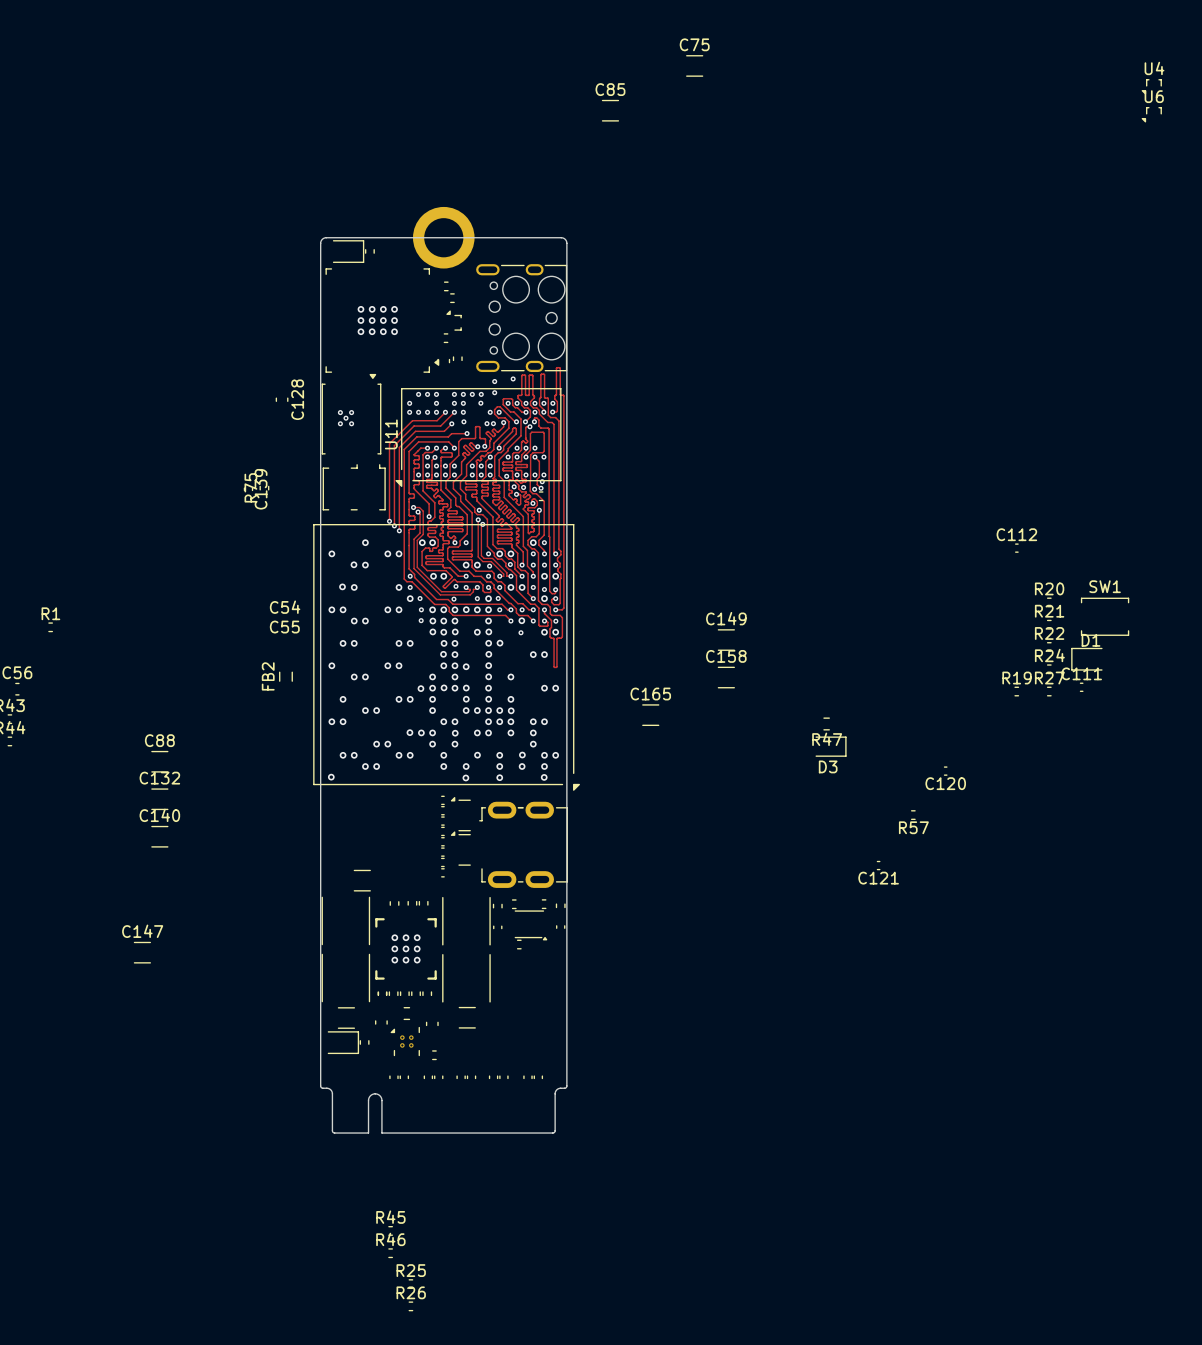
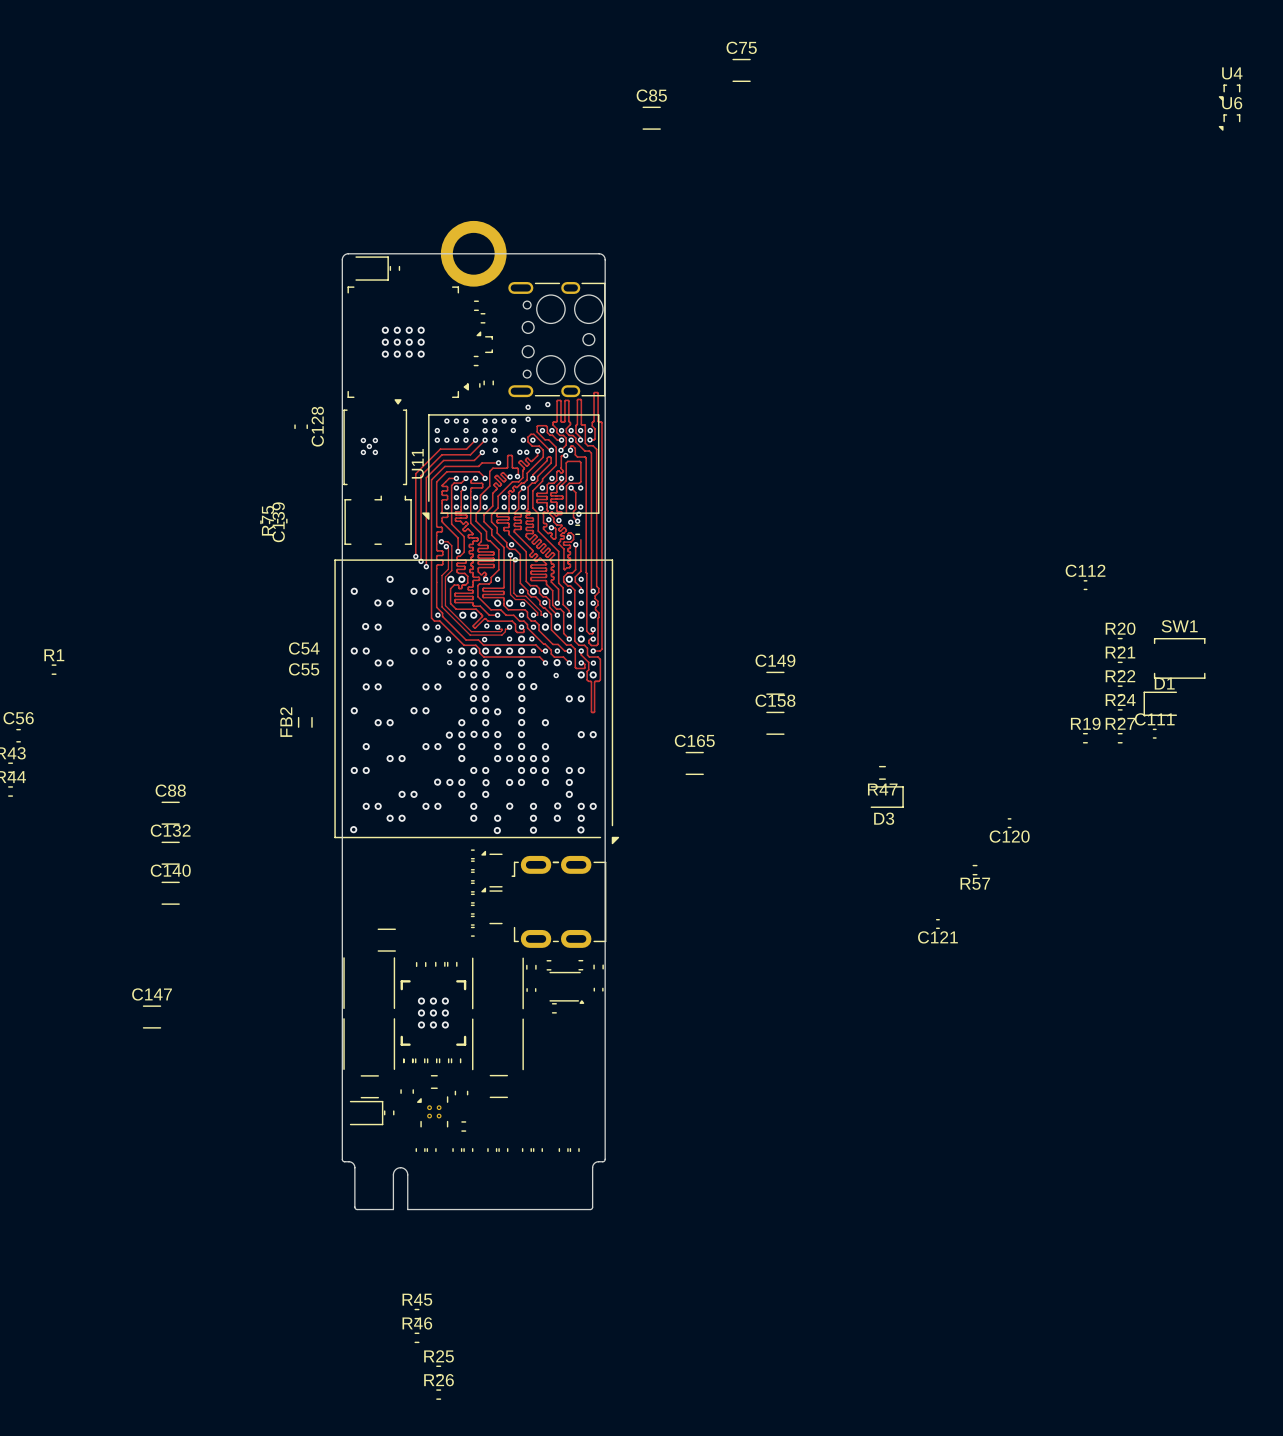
track: (530, 480) (530, 491) (536, 493) (544, 501) (544, 505) -> none

